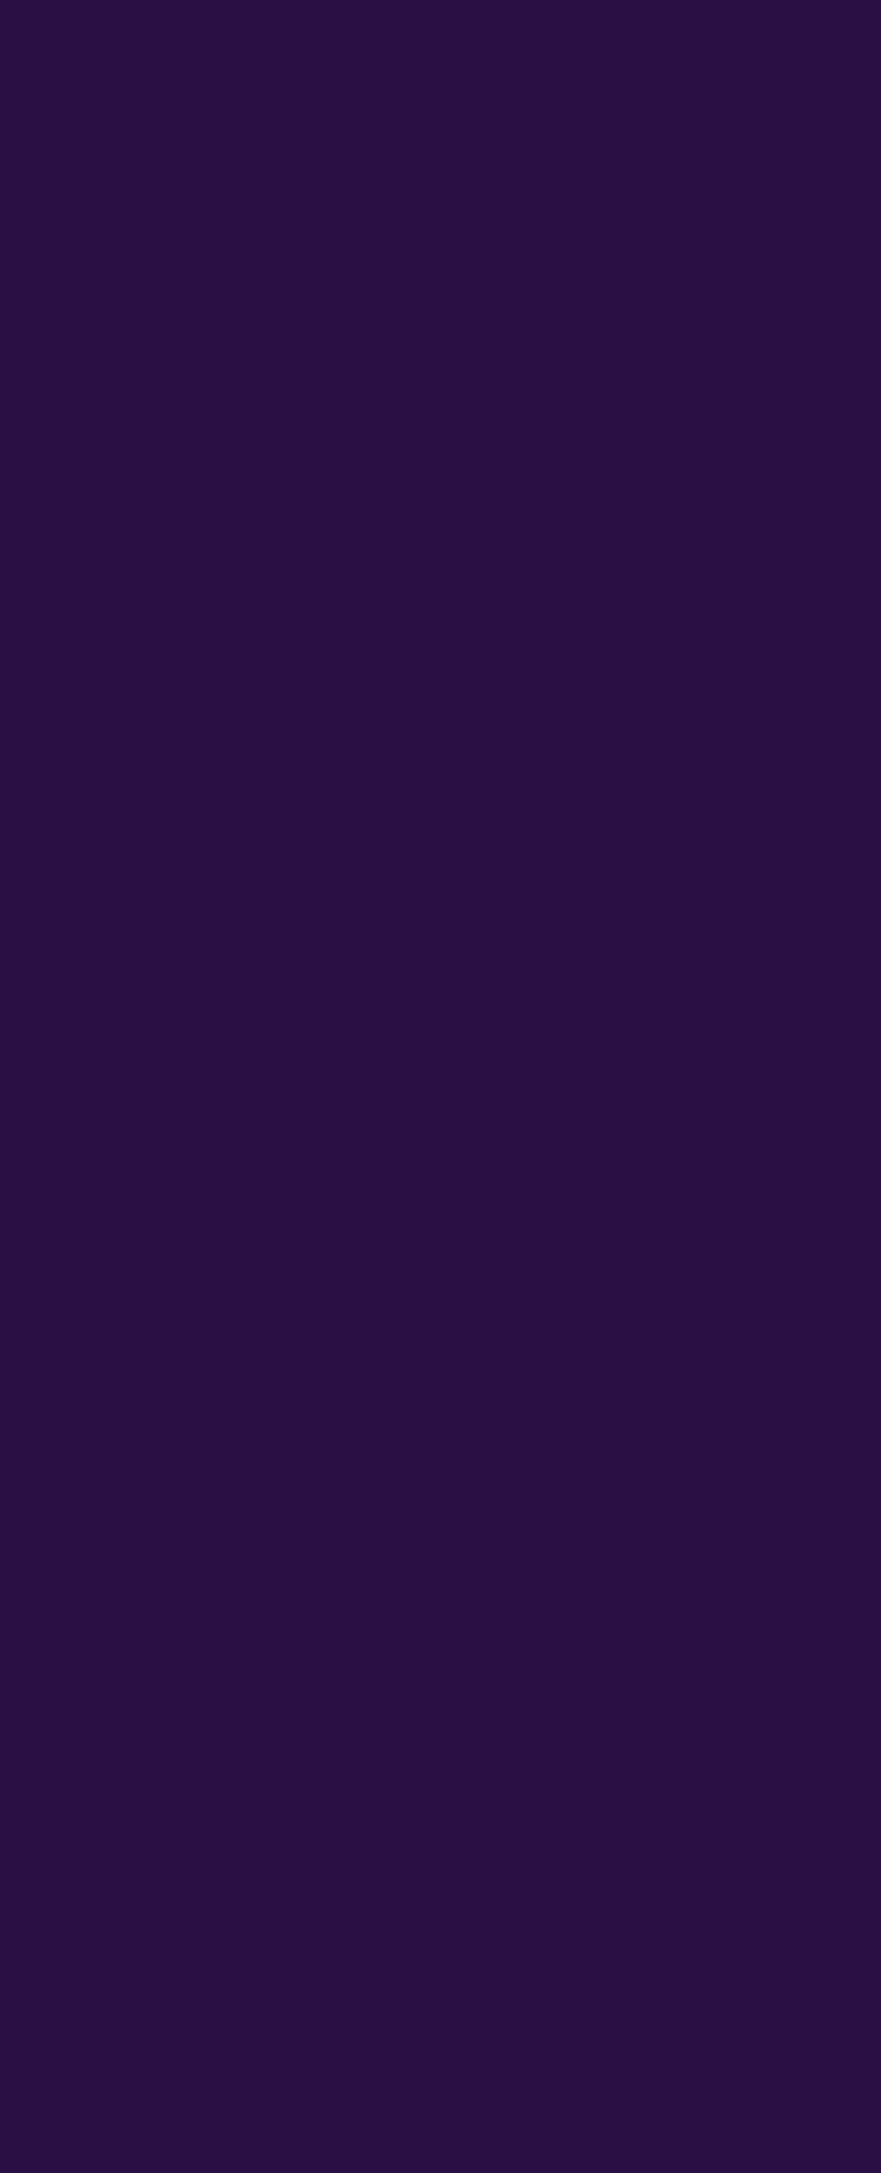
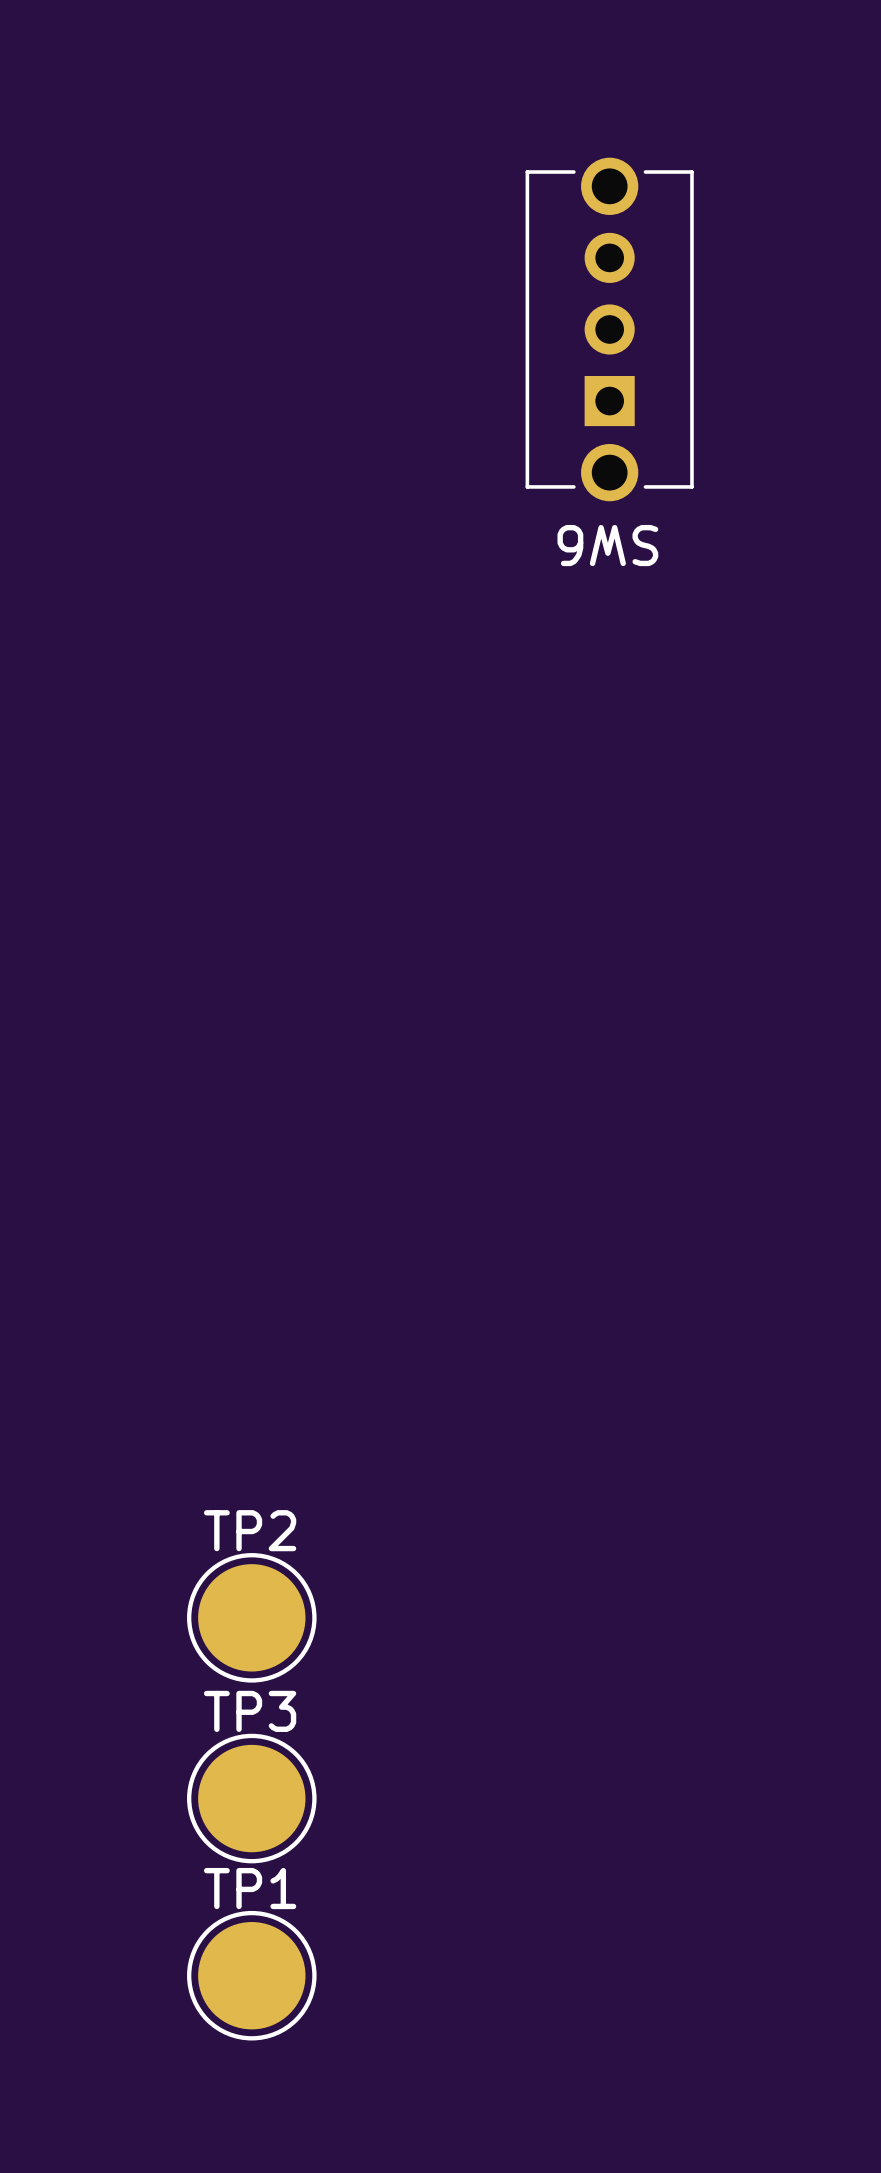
SW6: none -> (609, 329)
TP2: none -> (251, 1617)
TP3: none -> (251, 1798)
TP1: none -> (251, 1975)

